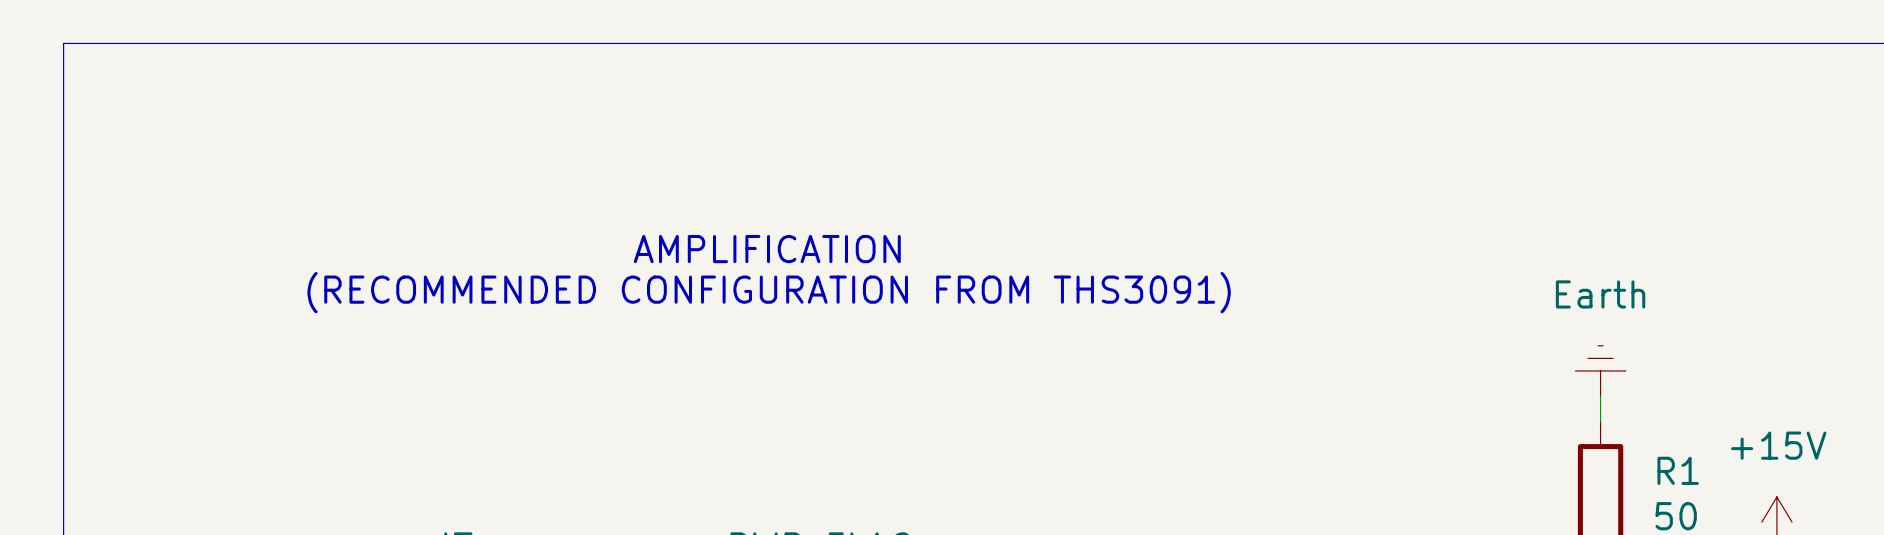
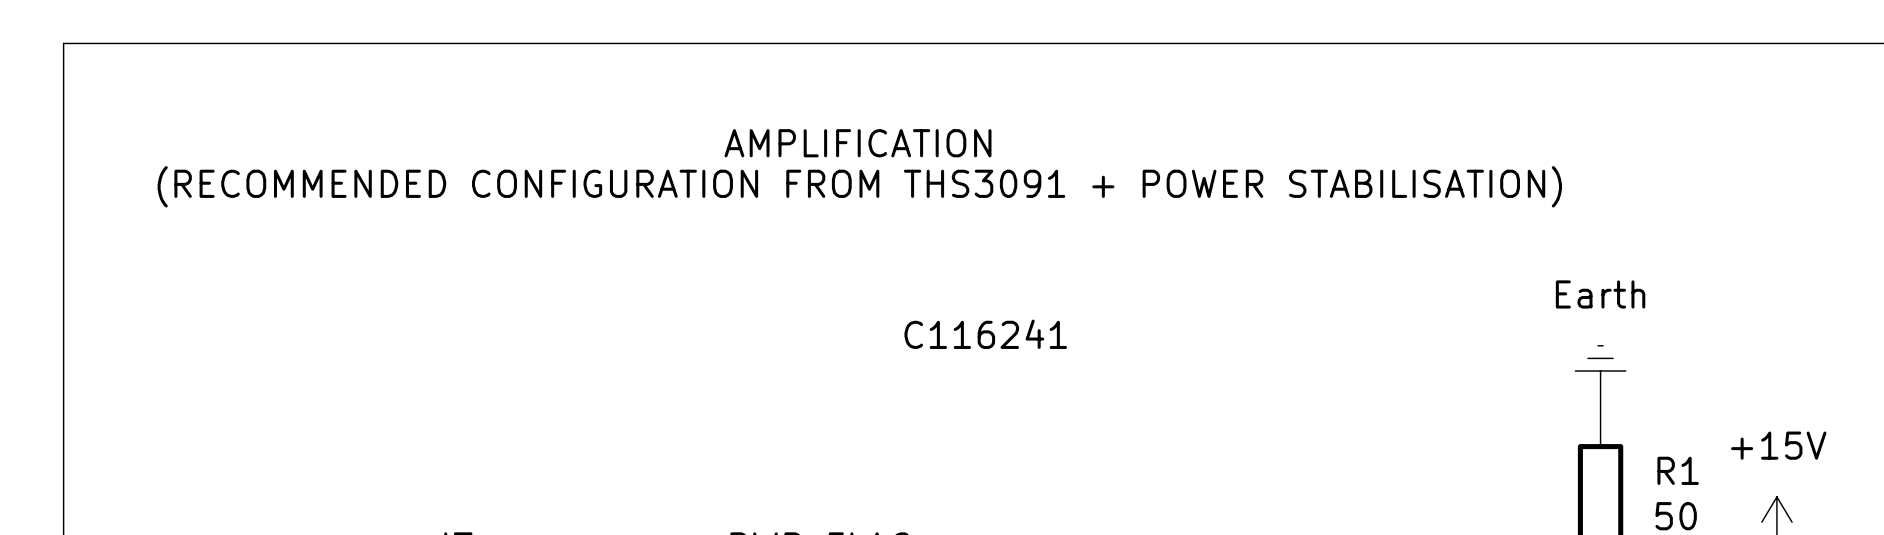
text: none -> (RECOMMENDED CONFIGURATION FROM THS3091 + POWER STABILISATION) (859, 186)
text position: AMPLIFICATION (767, 249) -> AMPLIFICATION (858, 143)
text: (RECOMMENDED CONFIGURATION FROM THS3091) (769, 292) -> none
text: none -> C116241 (985, 334)

